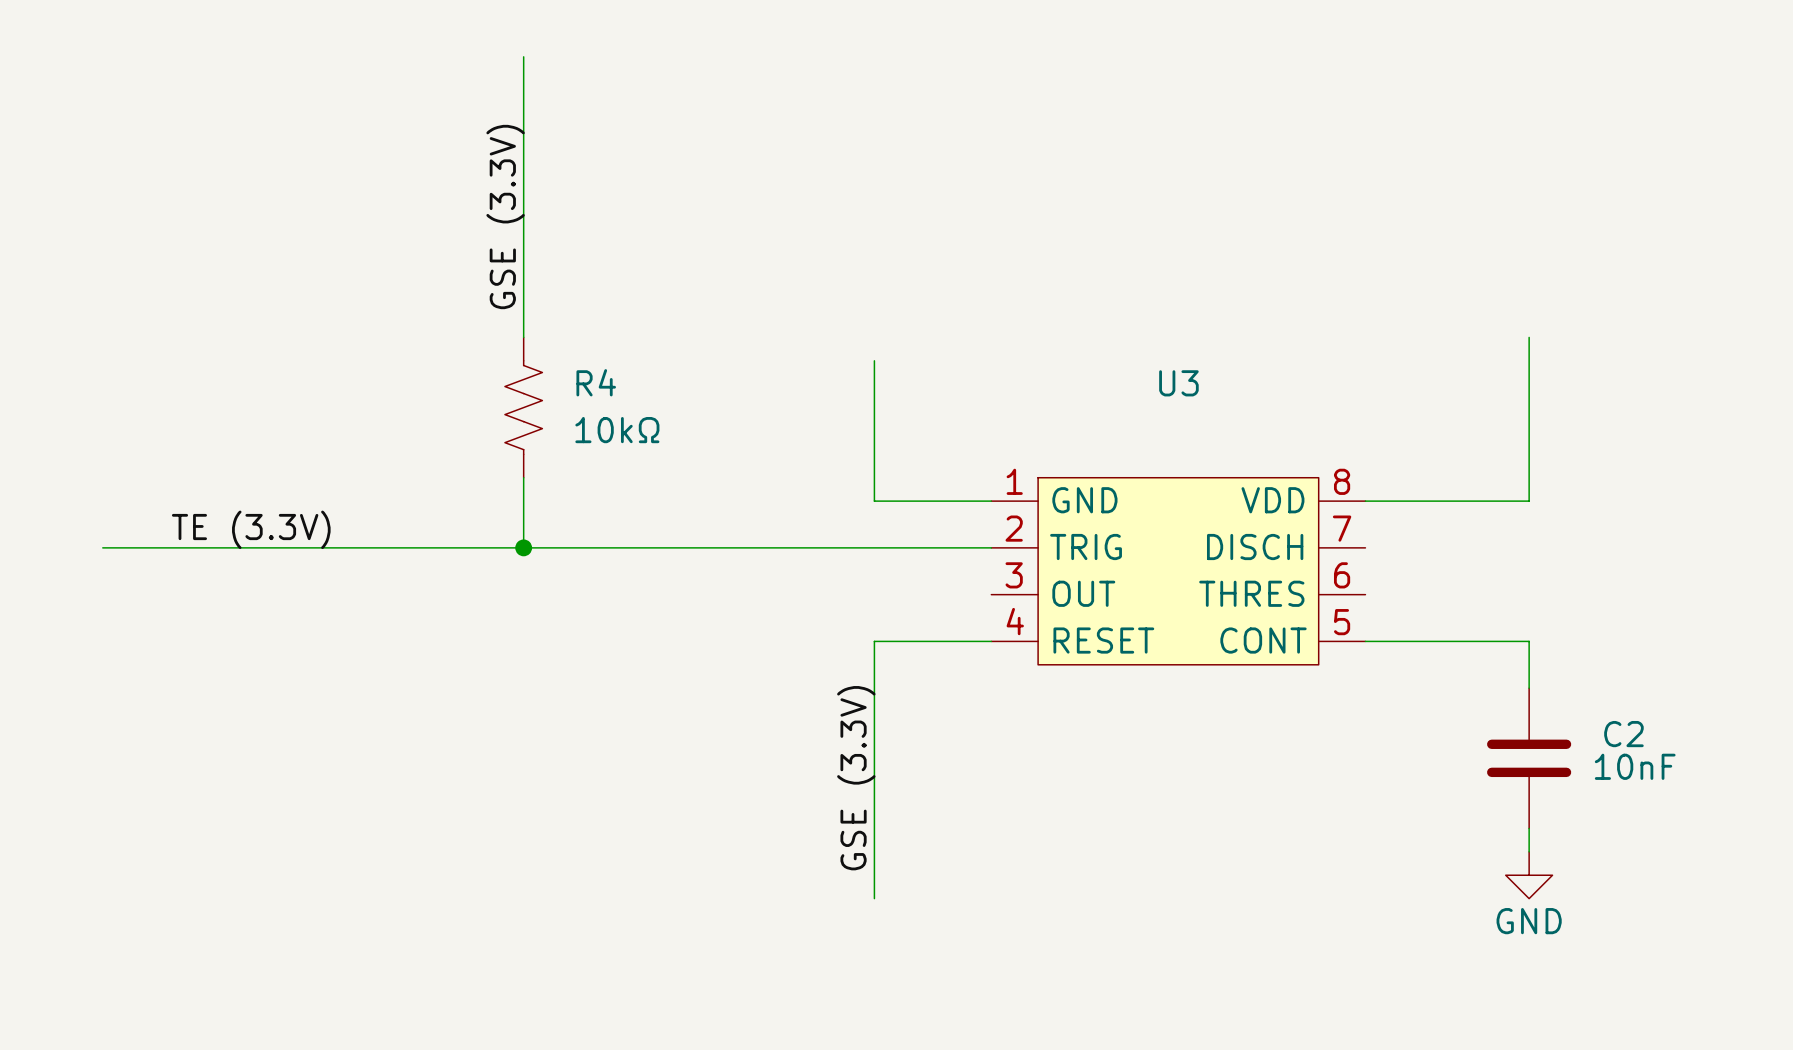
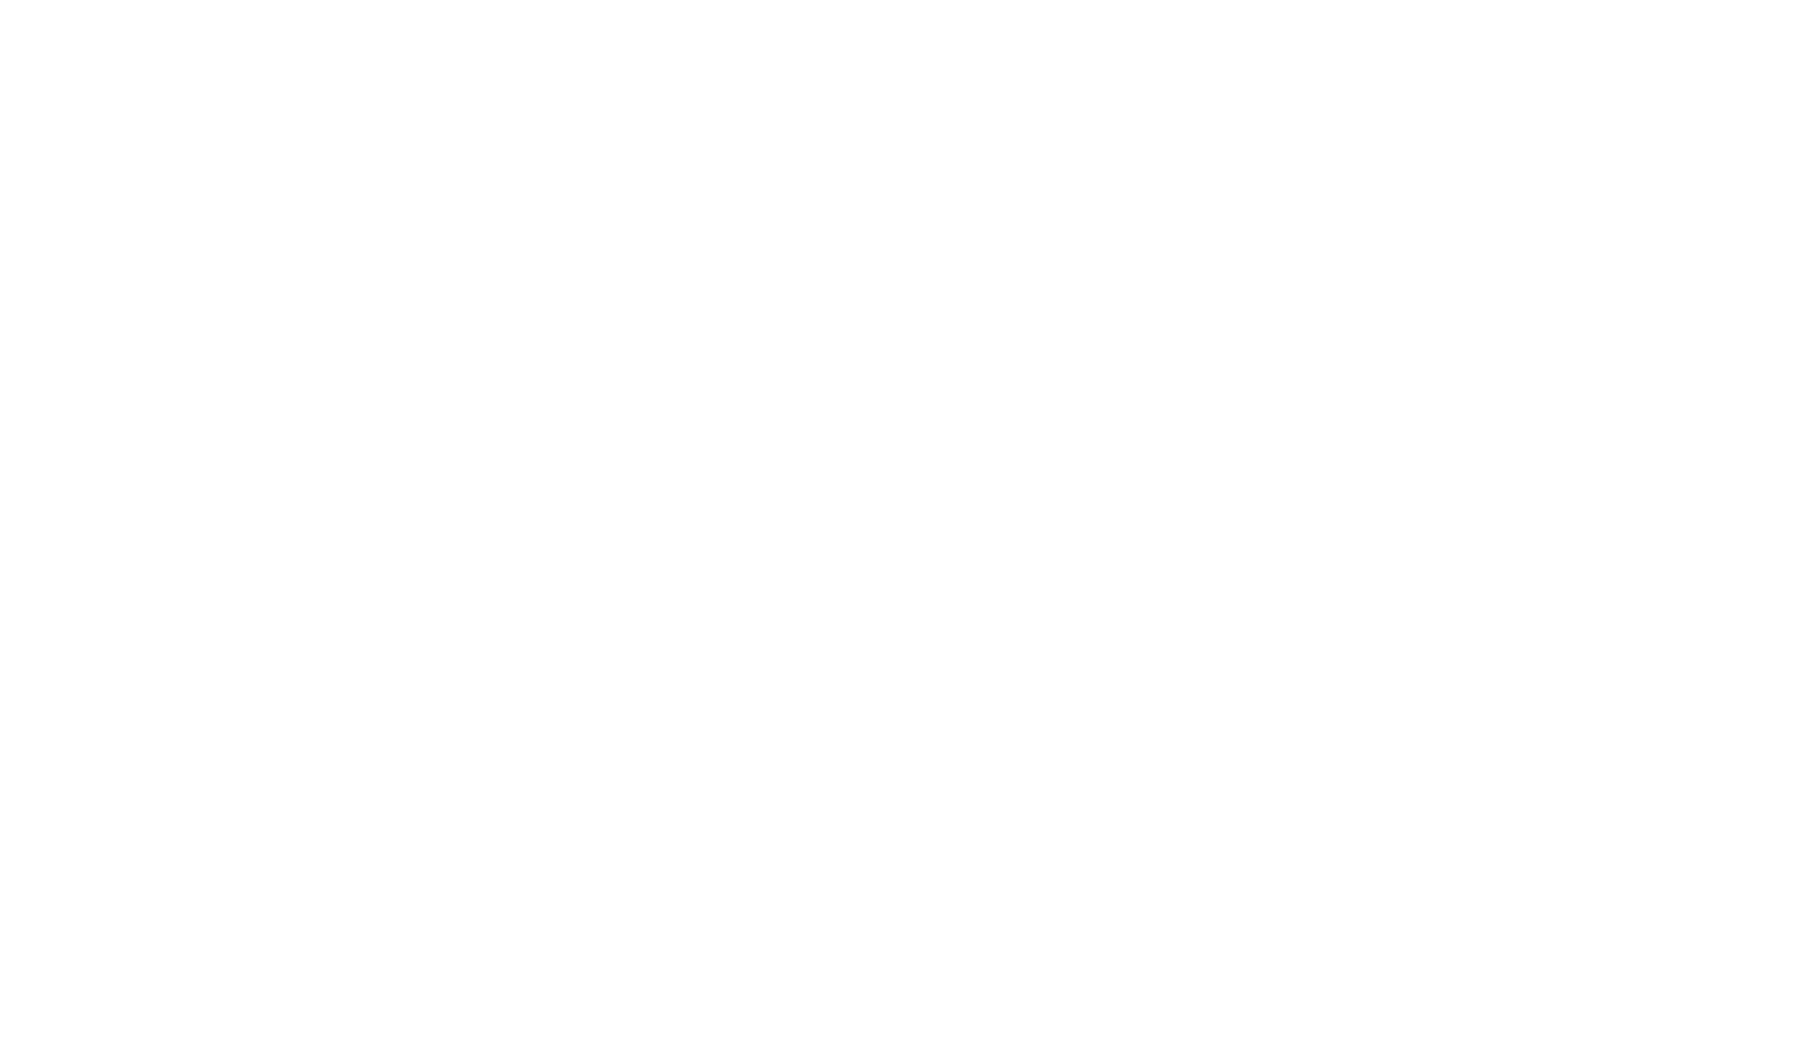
wire: (523, 56) (523, 337) -> none
label: GSE (3.3V) (505, 217) -> none
wire: (1529, 337) (1529, 501) (1365, 501) -> none
wire: (874, 360) (874, 501) (991, 501) -> none
R4: 10kΩ (523, 407) -> none
wire: (523, 477) (523, 547) -> none
label: TE (3.3V) (251, 529) -> none
wire: (102, 547) (991, 547) -> none
junction: (523, 547) -> none
U3: (1178, 571) -> none
wire: (991, 641) (874, 641) (874, 898) -> none
wire: (1365, 641) (1529, 641) (1529, 688) -> none
C2: 10nF (1529, 758) -> none
label: GSE (3.3V) (856, 778) -> none
wire: (1529, 828) (1529, 851) -> none
power symbol: GND (1529, 875) -> none

